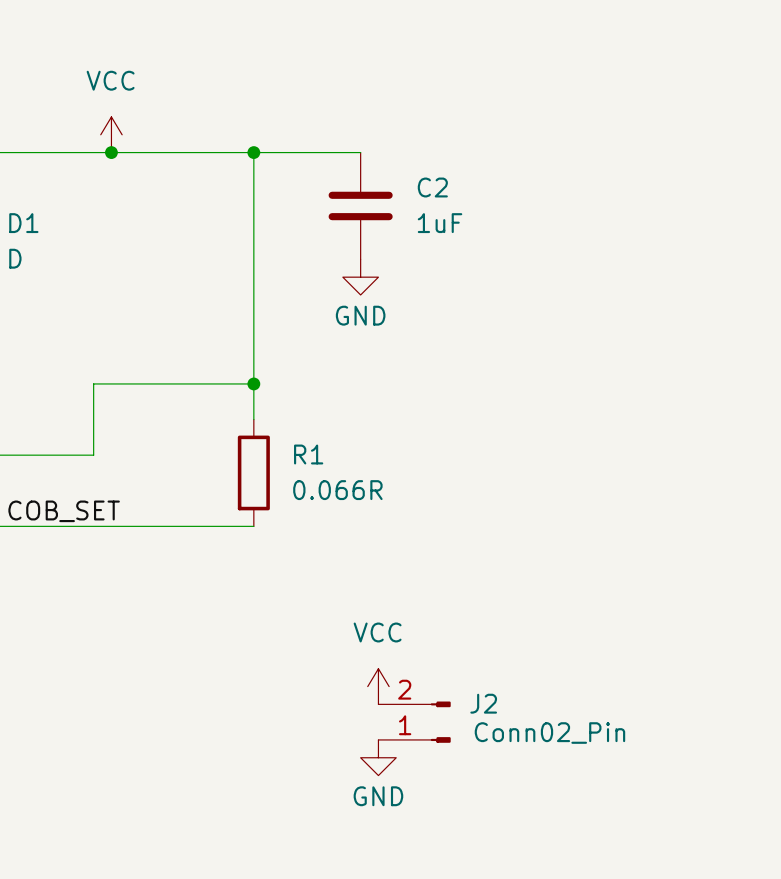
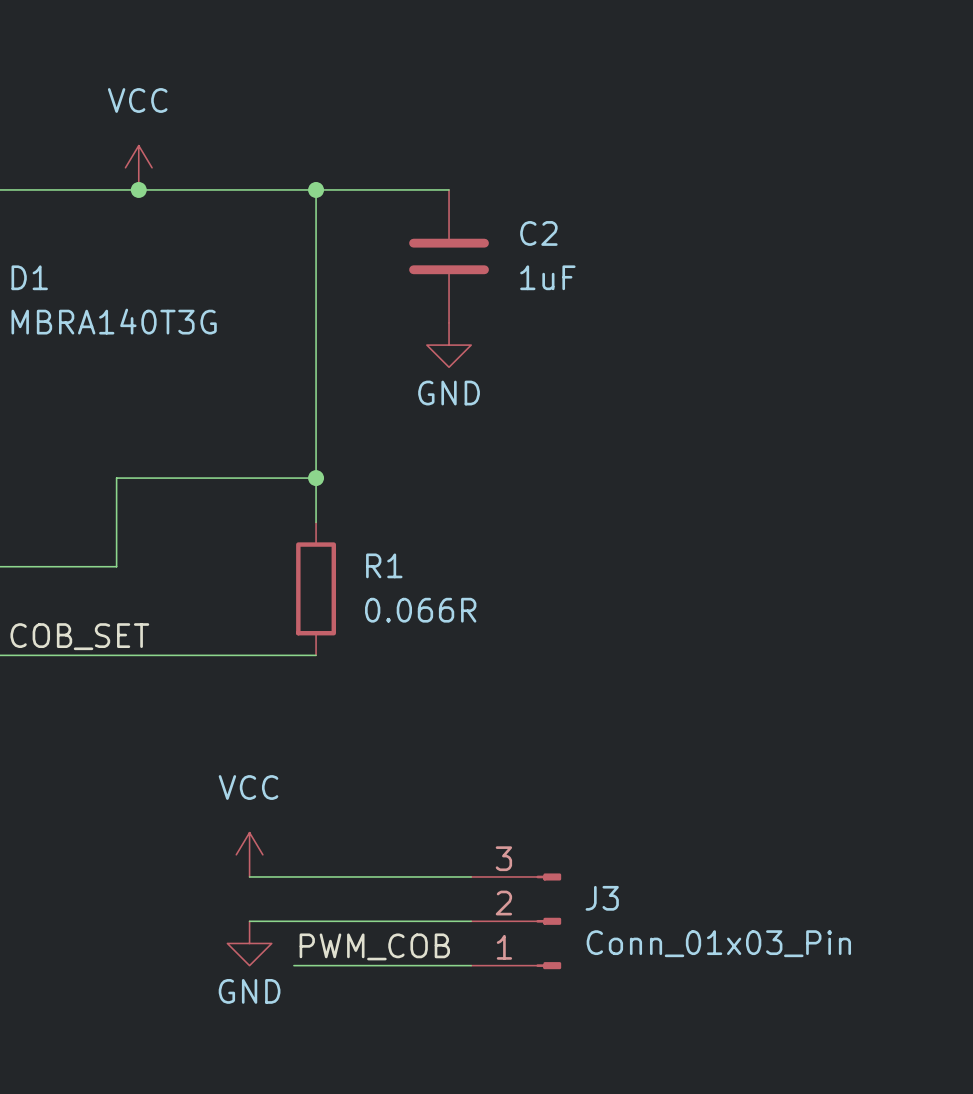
D1 value: D (15, 258) -> MBRA140T3G (114, 321)
power symbol position: VCC (378, 686) -> VCC (249, 854)
wire: none -> (249, 876) (471, 876)
J2: Conn02_Pin (414, 722) -> none
wire: none -> (249, 921) (471, 921)
J3: none -> Conn_01x03_Pin (516, 921)
power symbol position: GND (378, 757) -> GND (249, 943)
label: none -> PWM_COB (374, 946)
wire: none -> (293, 965) (471, 965)

